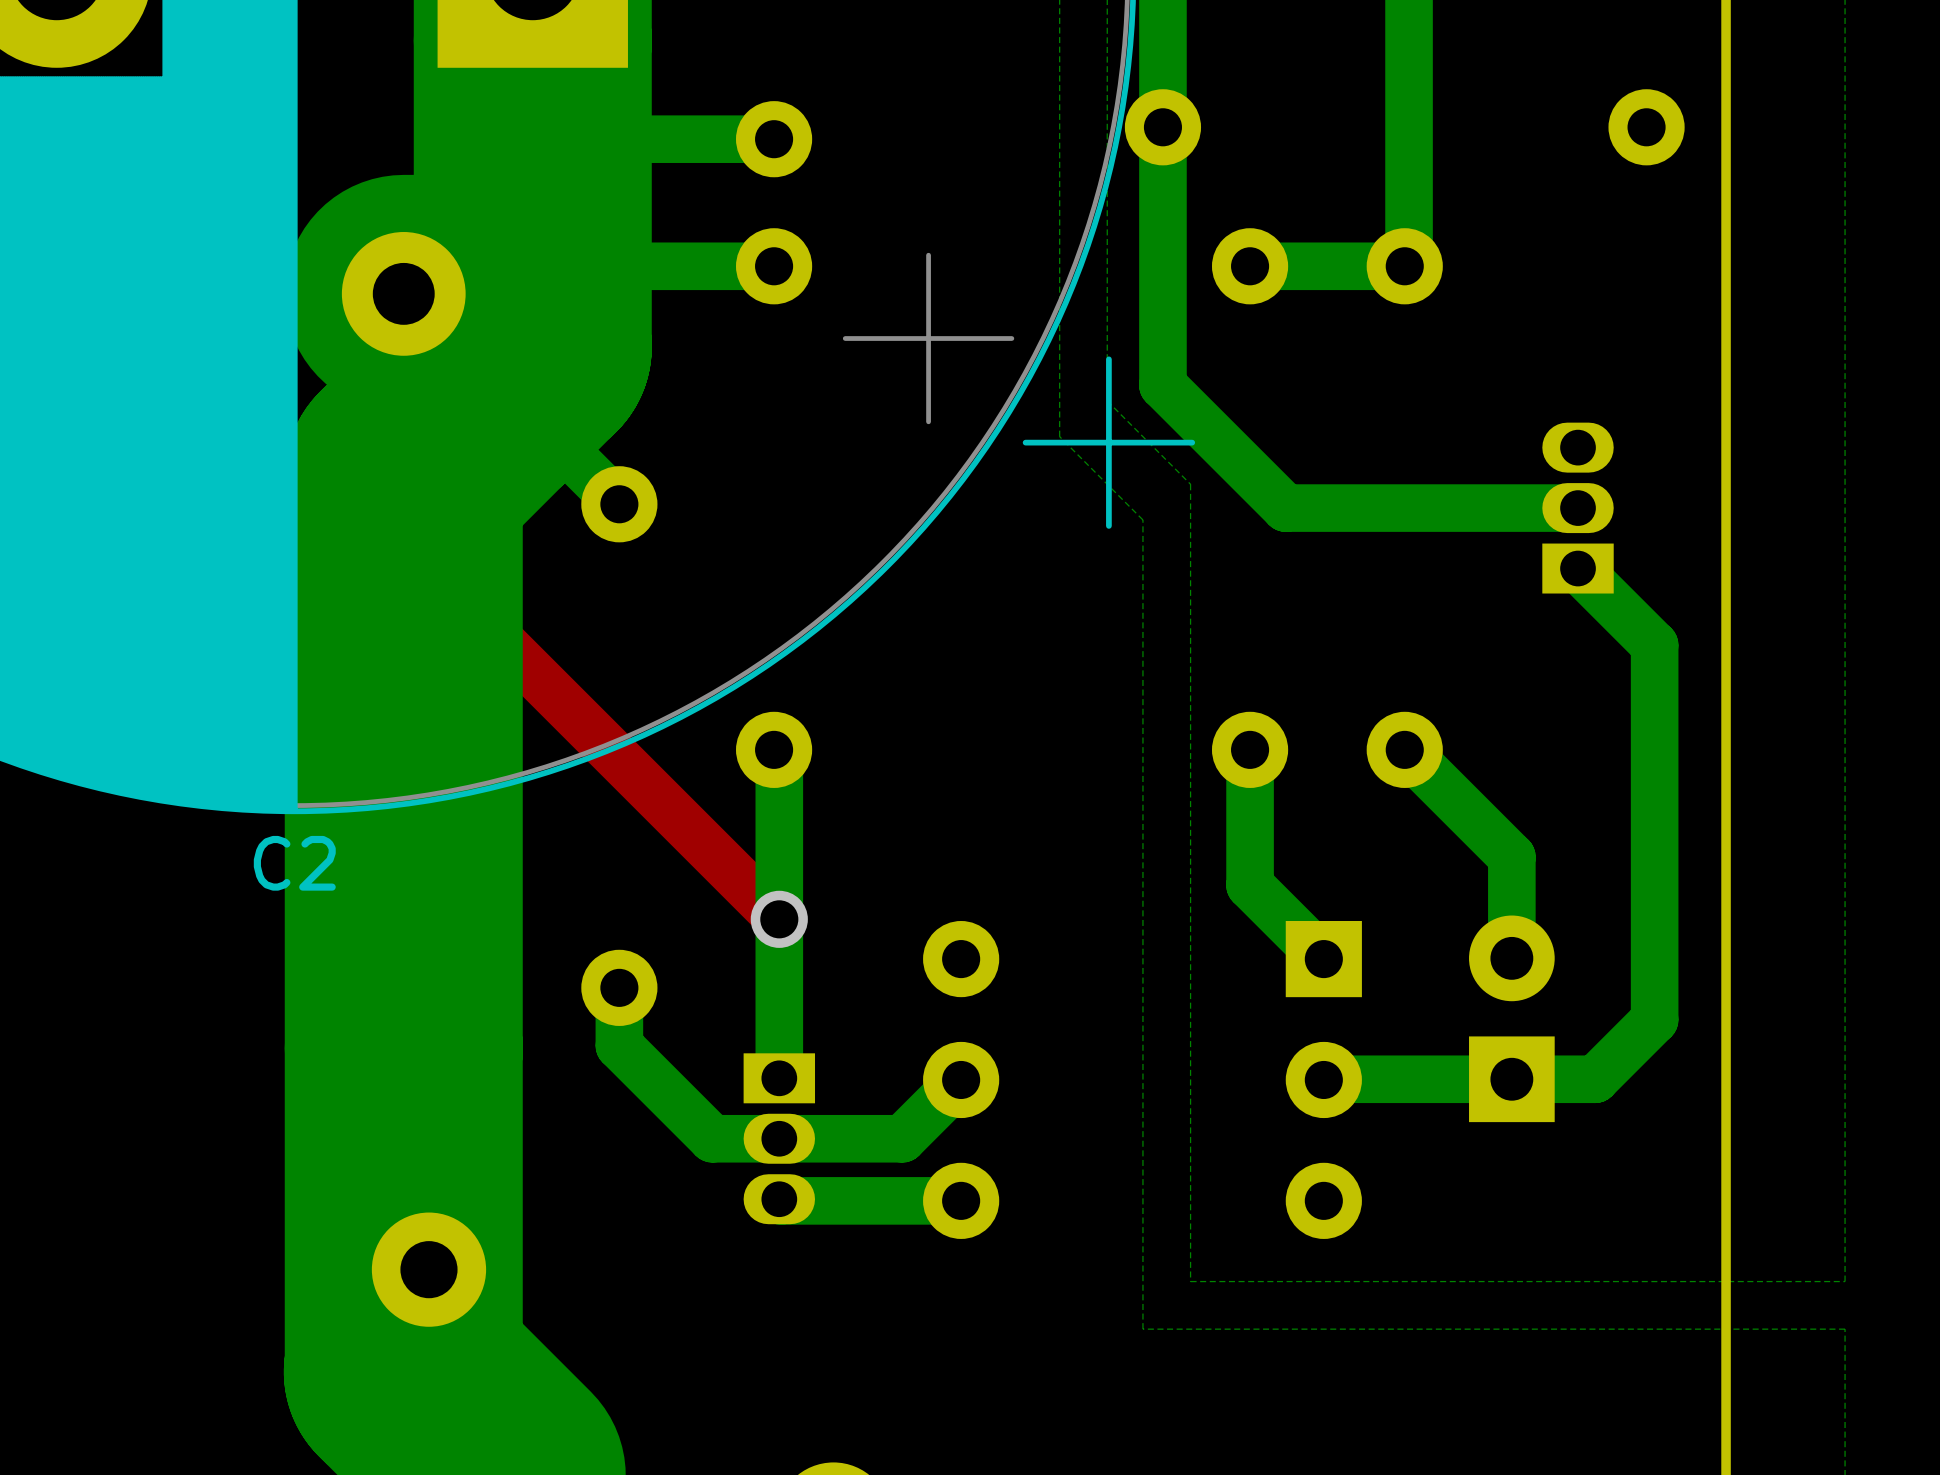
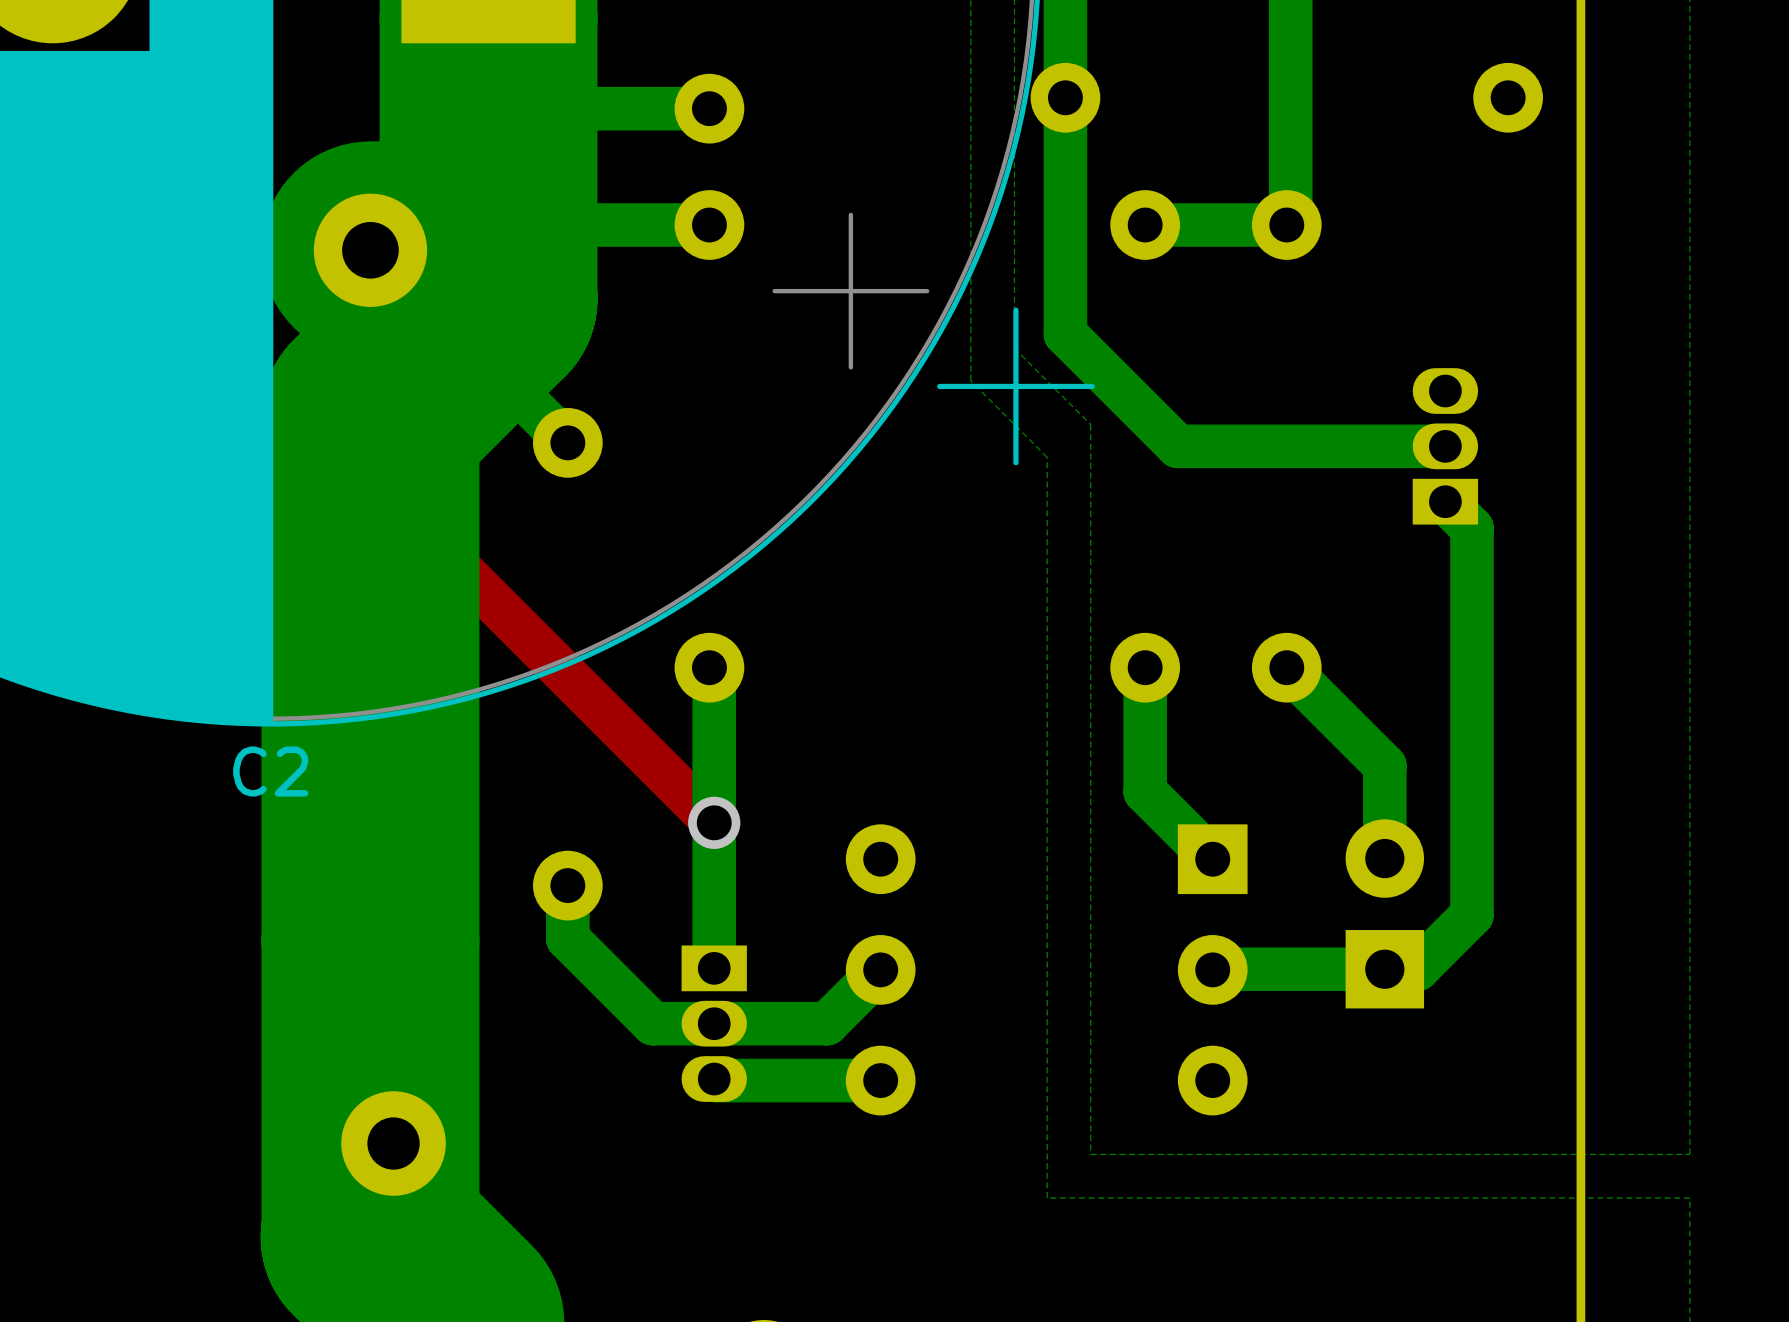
bottom track: (1607, 597) (1654, 645) (1654, 1019) (1595, 1079) (1547, 1079) -> (1471, 528) (1471, 914) (1417, 969)

